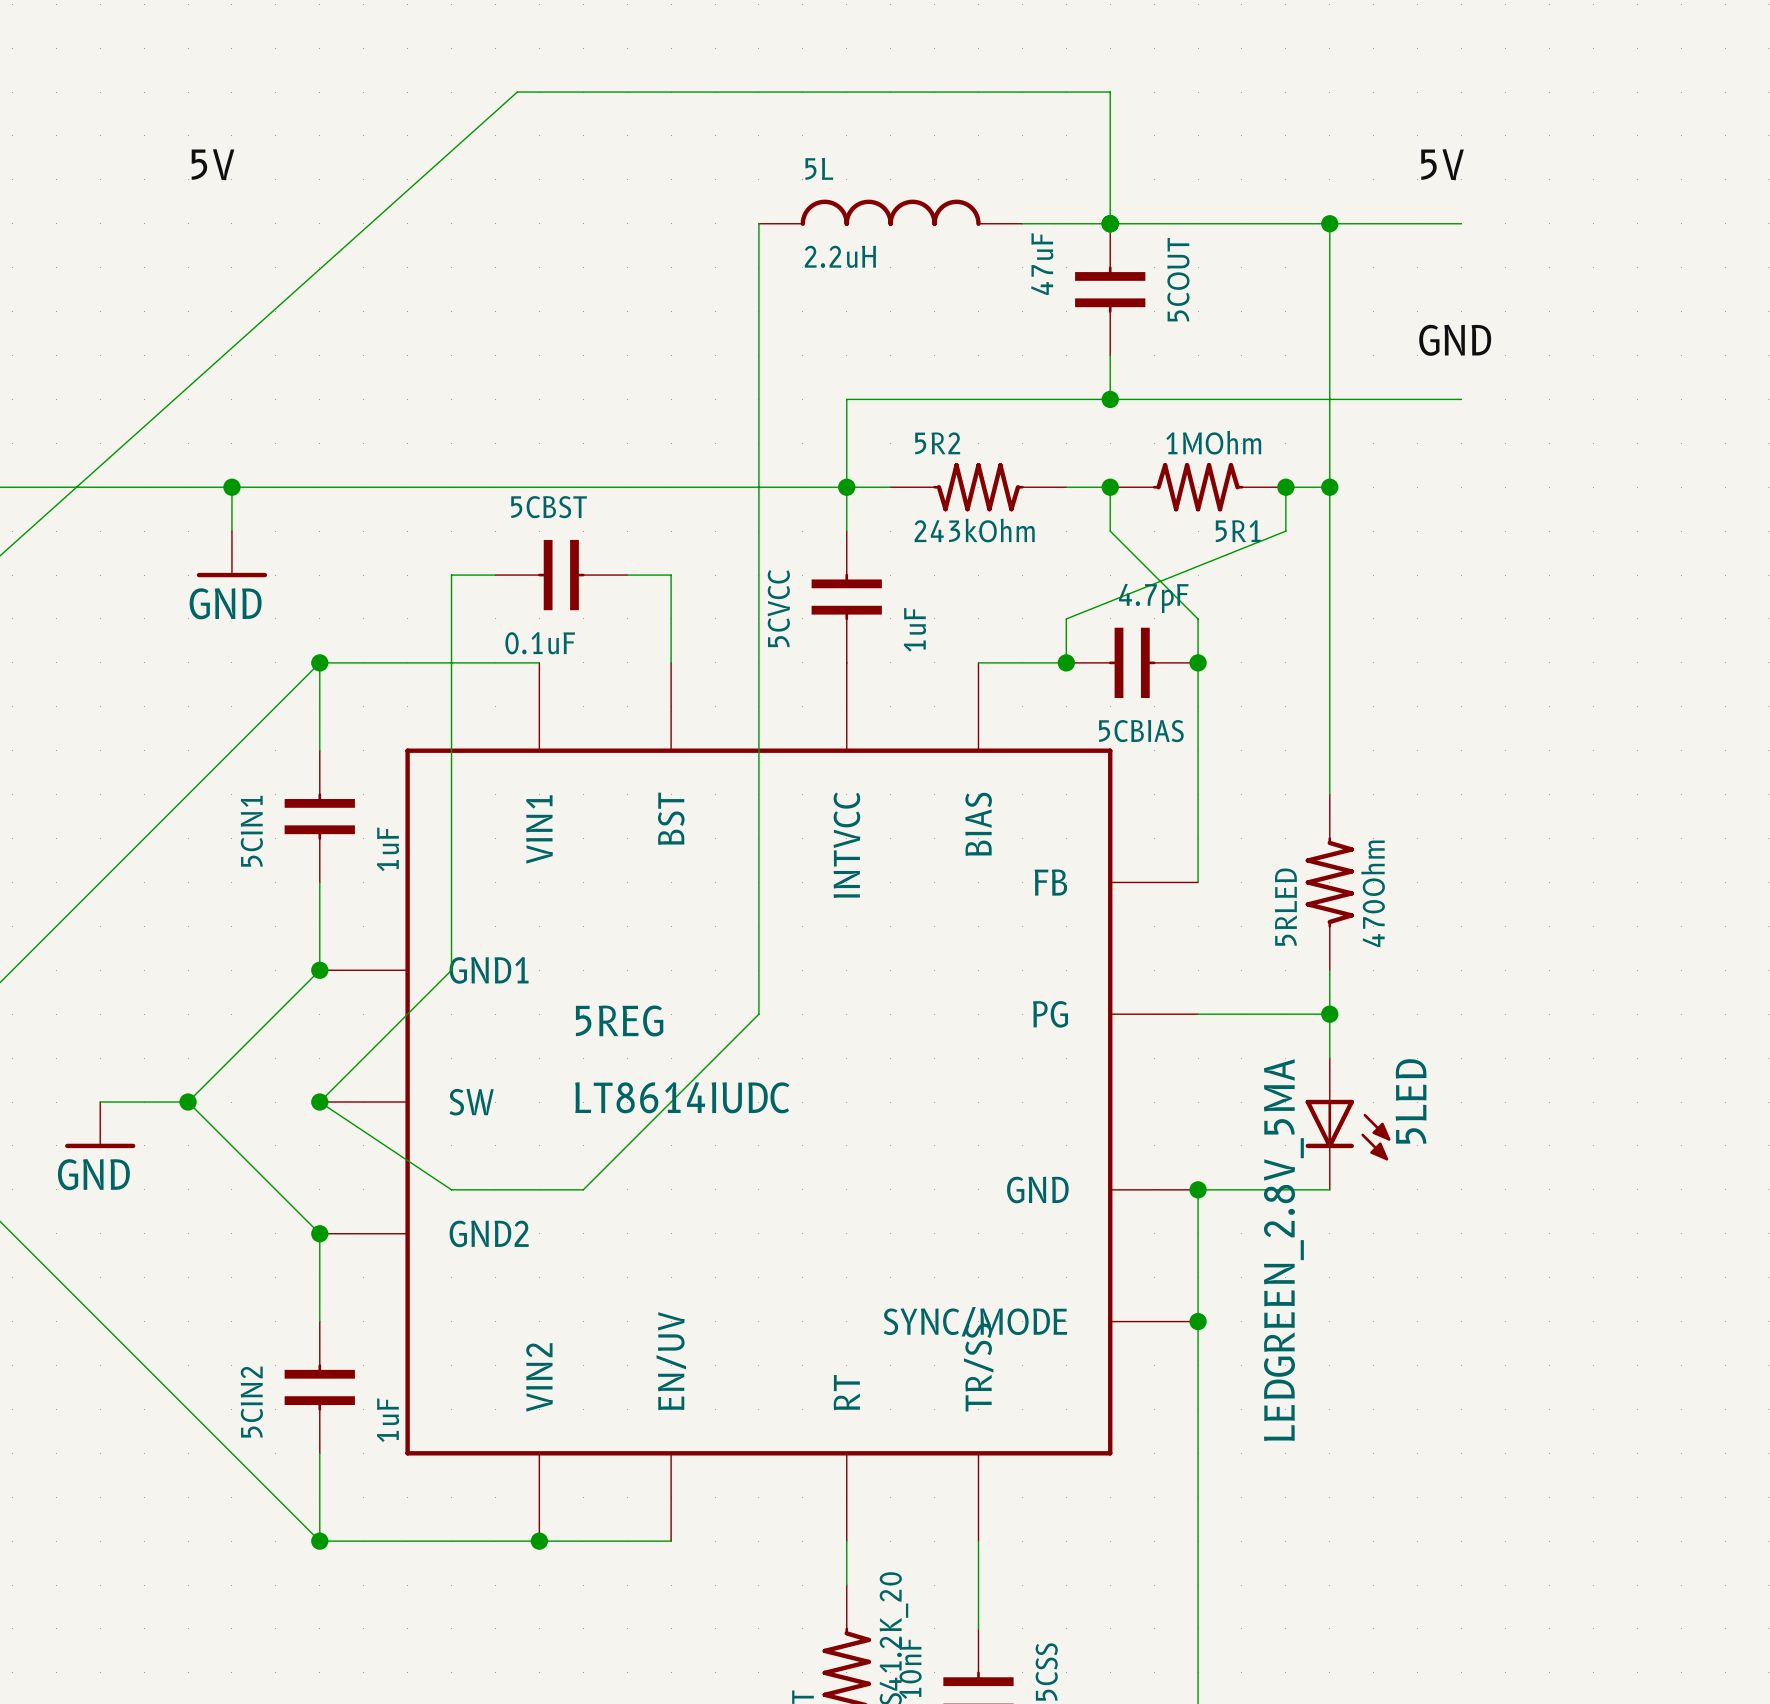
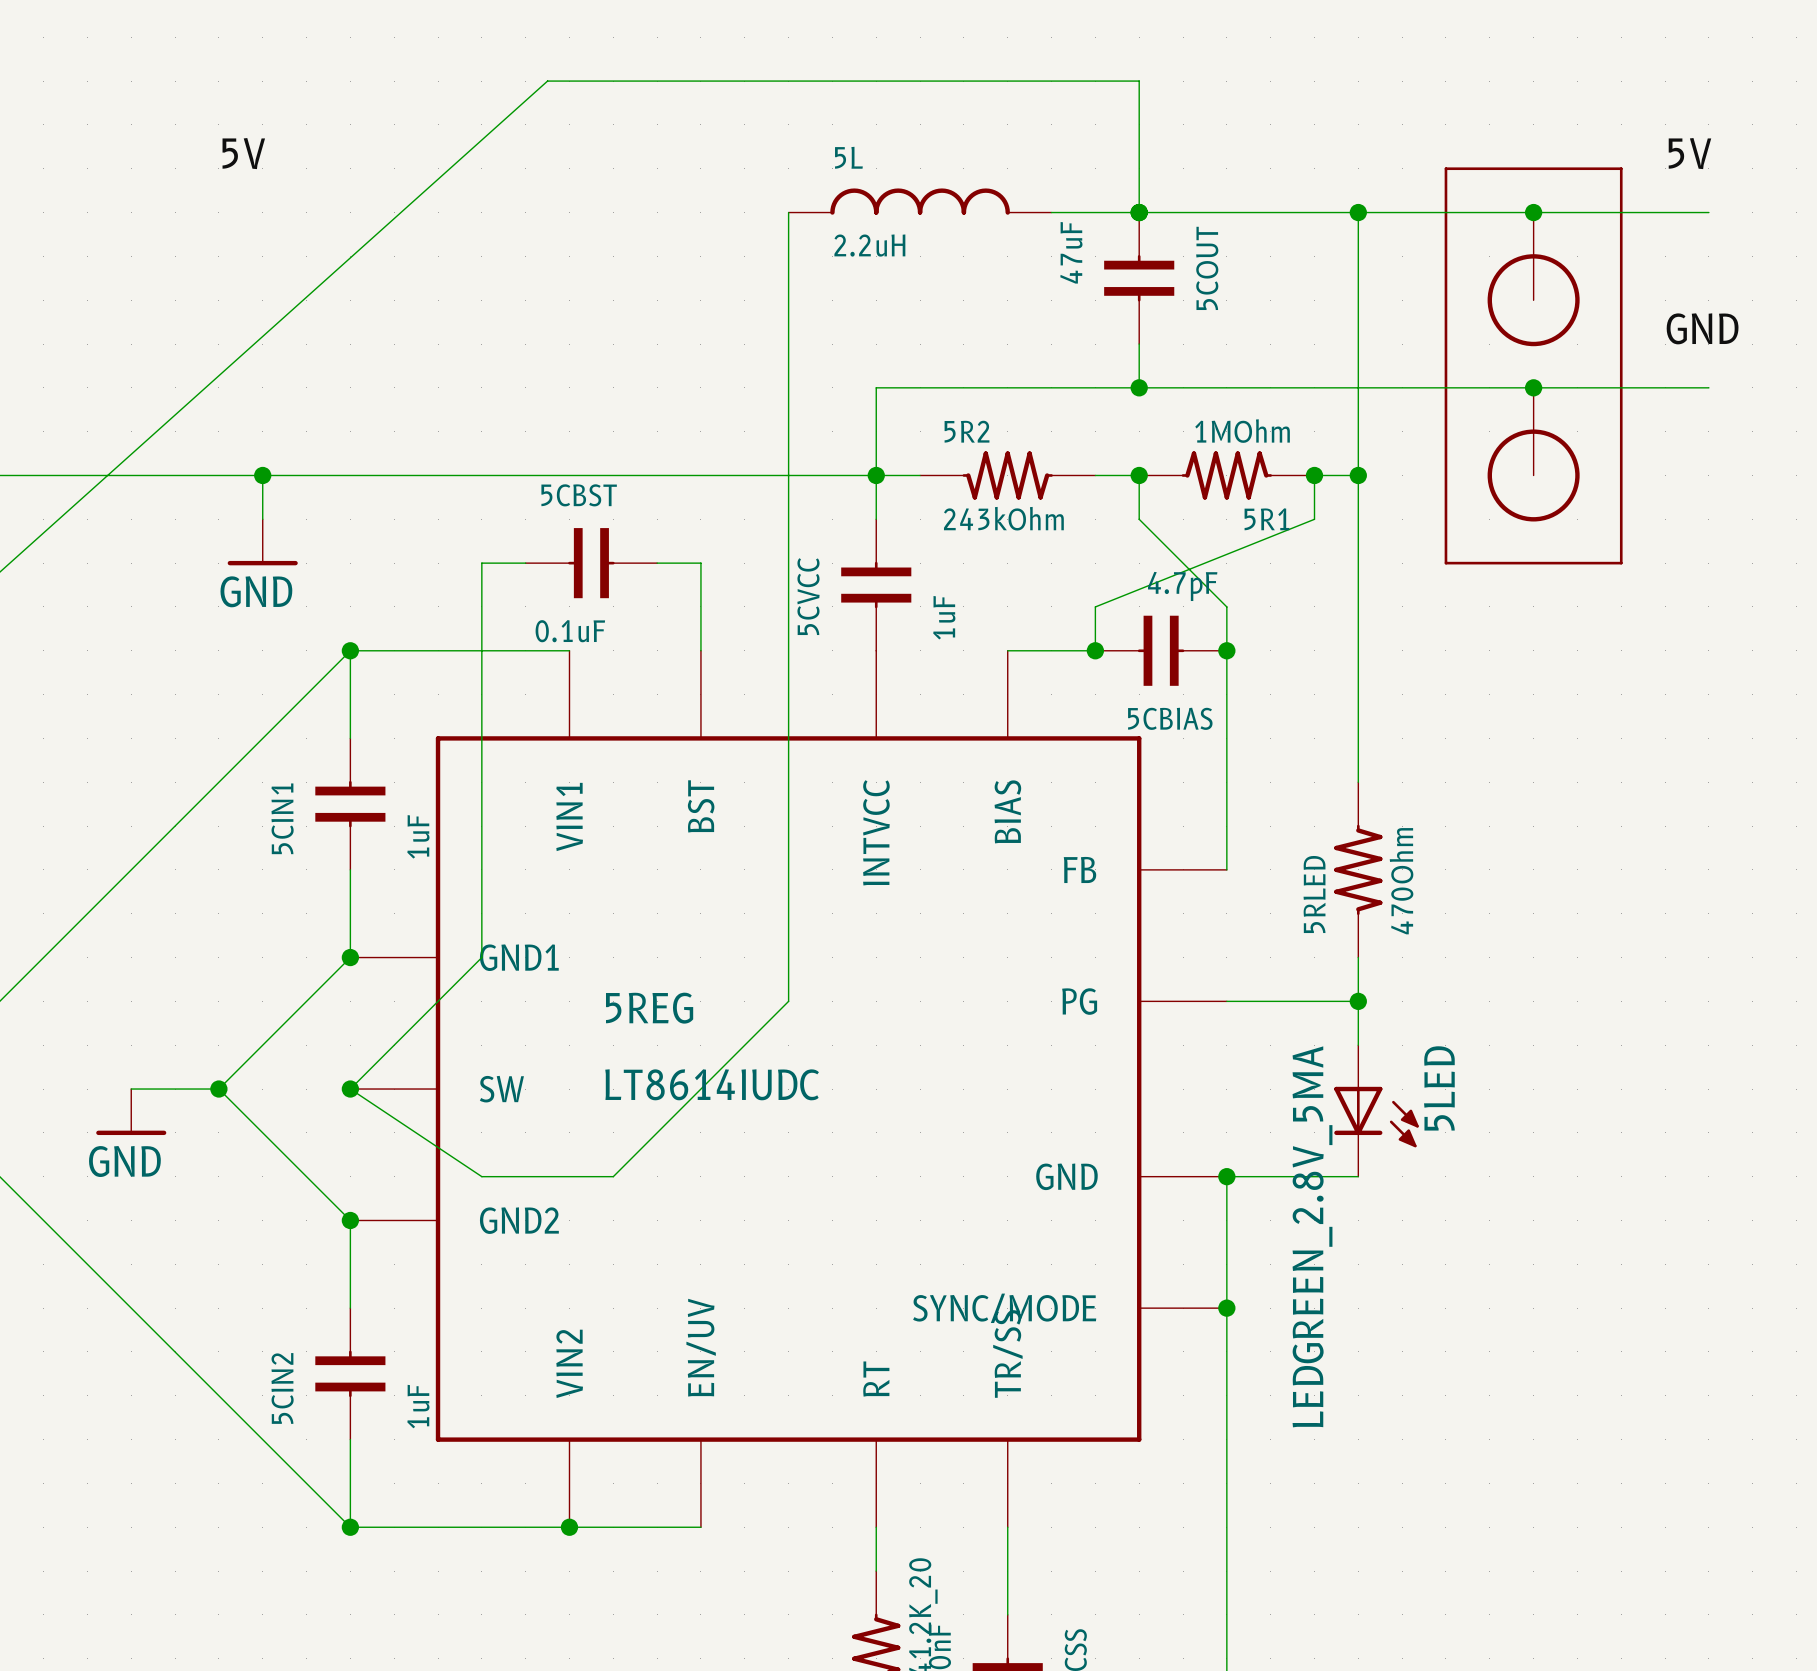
label position: 5V (1442, 164) -> 5V (1689, 153)
line: none -> (1445, 168) (1445, 563) (1621, 563) (1621, 168) (1445, 168)
wire: none -> (1489, 212) (1708, 212)
junction: none -> (1533, 212)
part: none -> (1533, 279)
label position: GND (1455, 340) -> GND (1702, 328)
wire: none -> (1489, 387) (1708, 387)
junction: none -> (1533, 387)
part: none -> (1533, 454)

